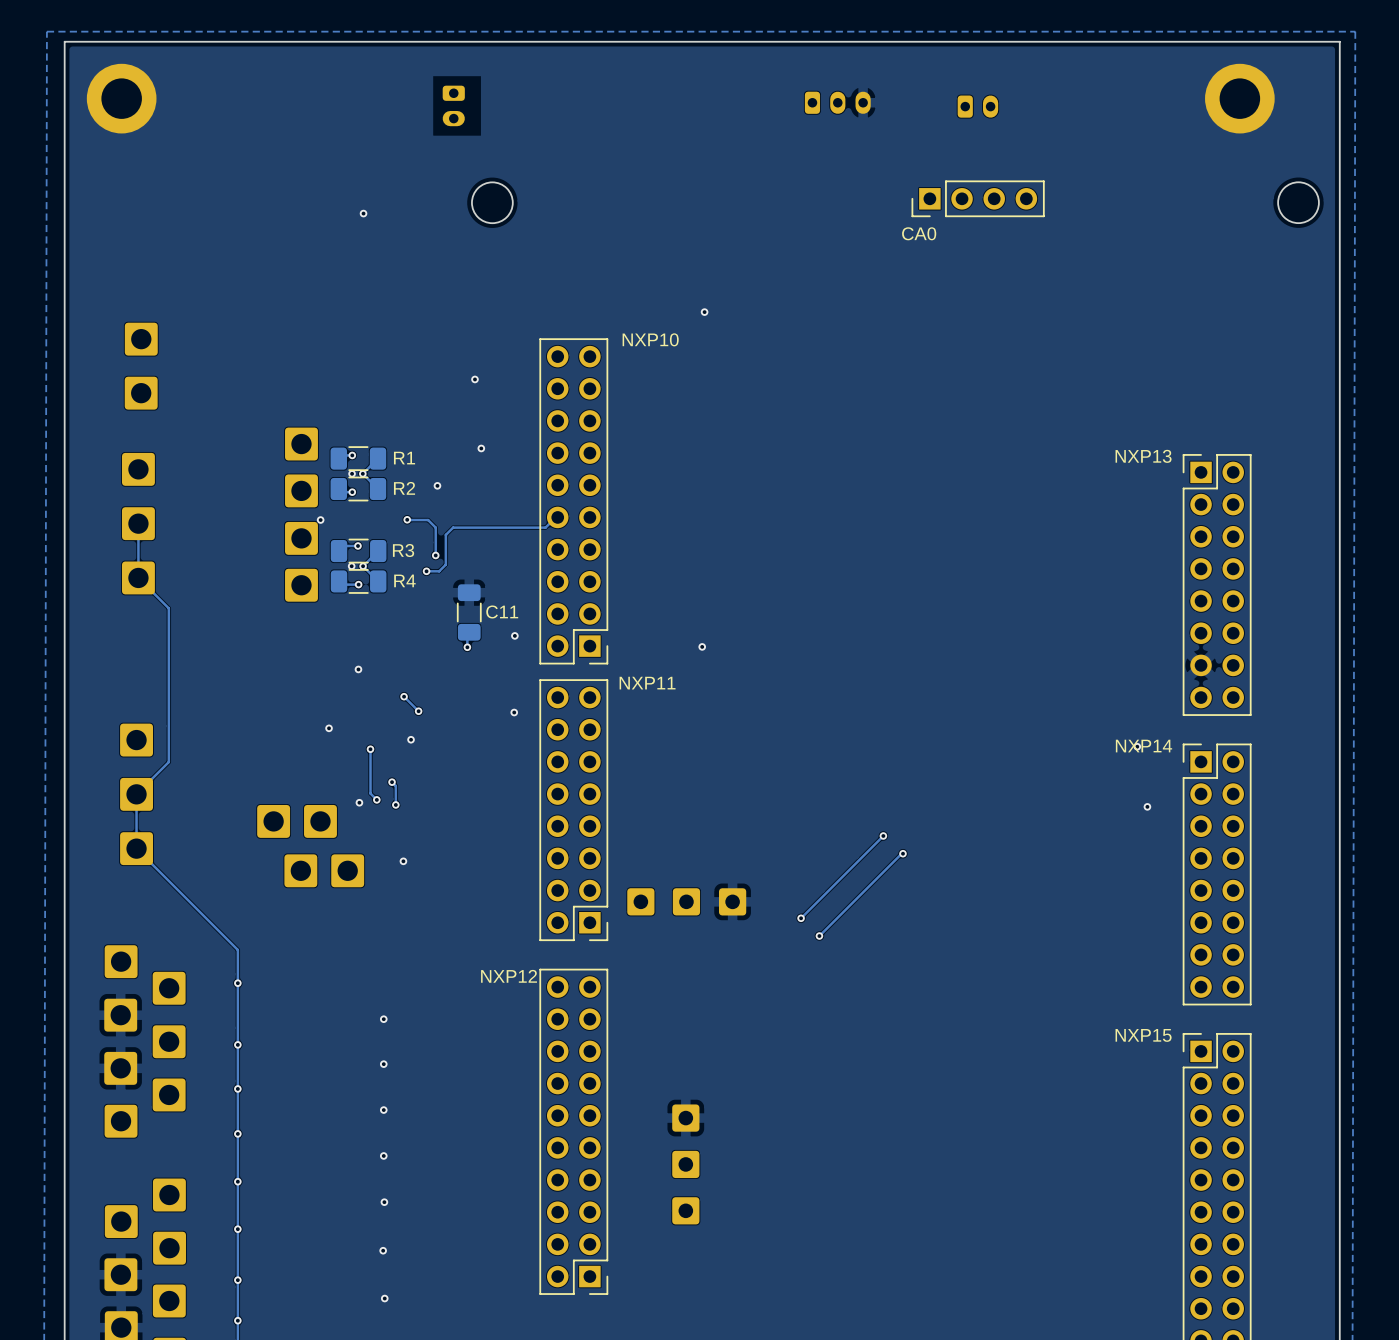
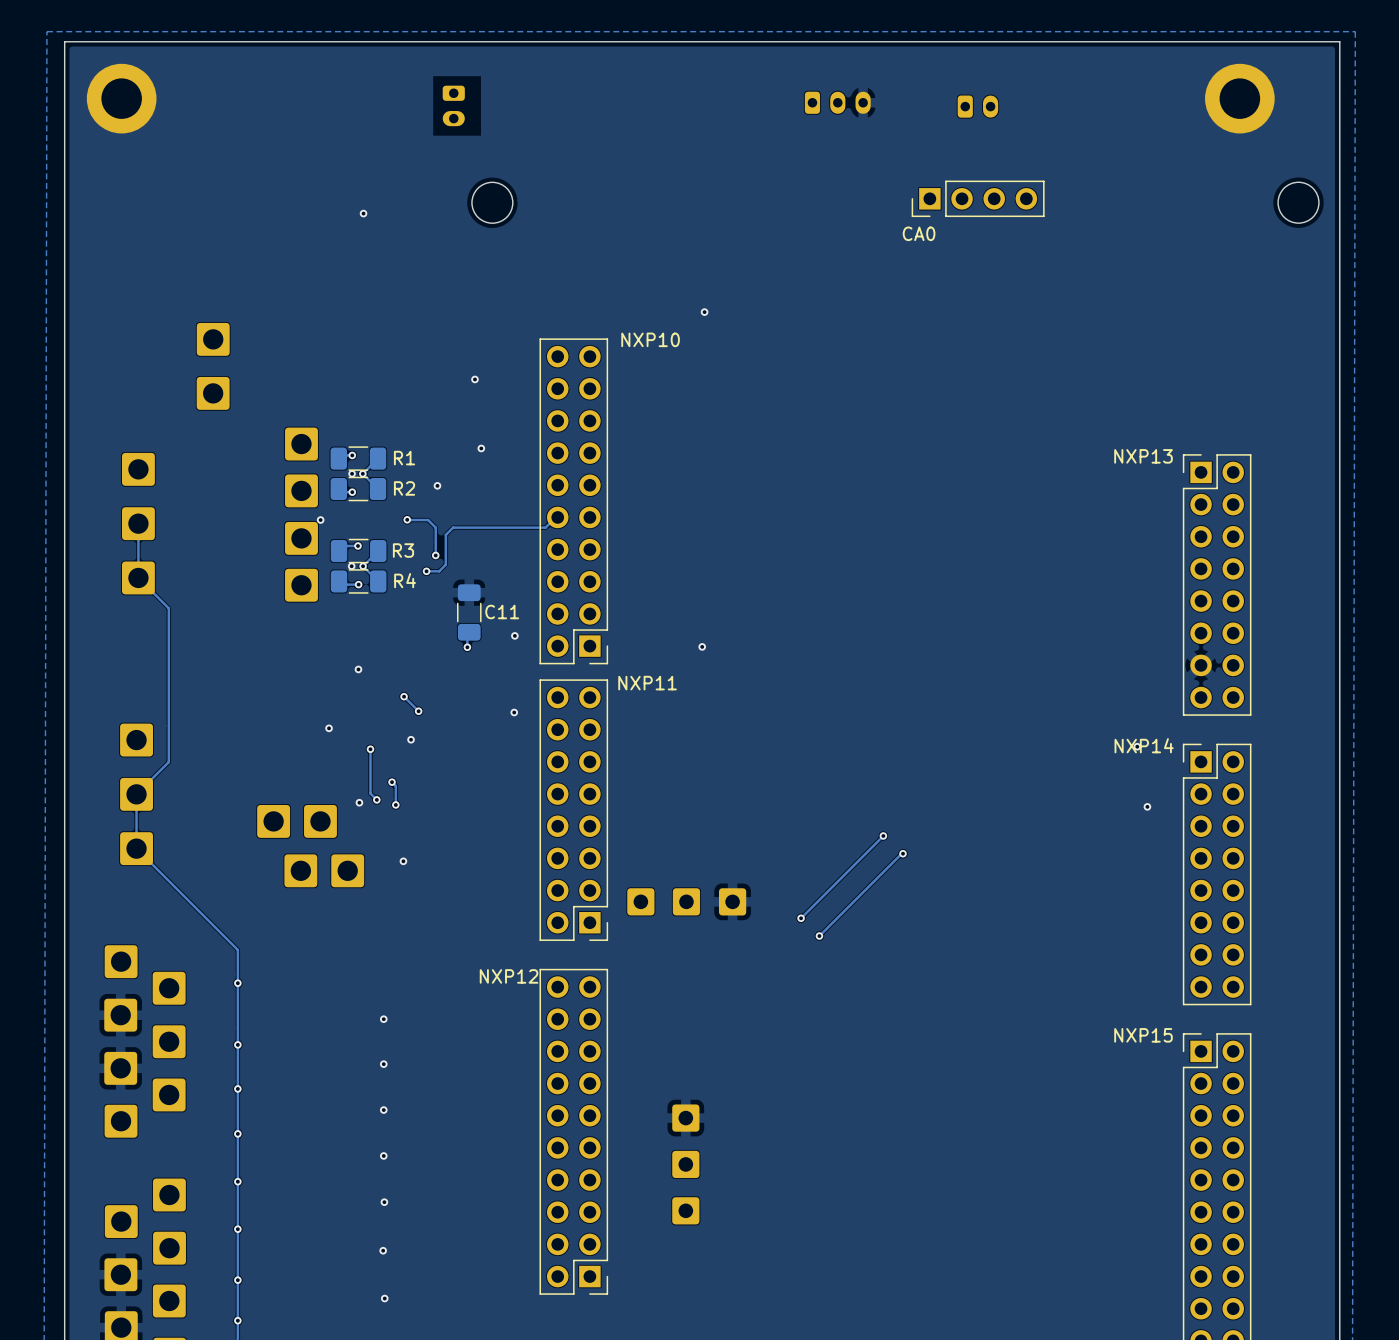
part: (141, 339) -> none
part: none -> (213, 339)
part: (141, 393) -> none
part: none -> (213, 393)

